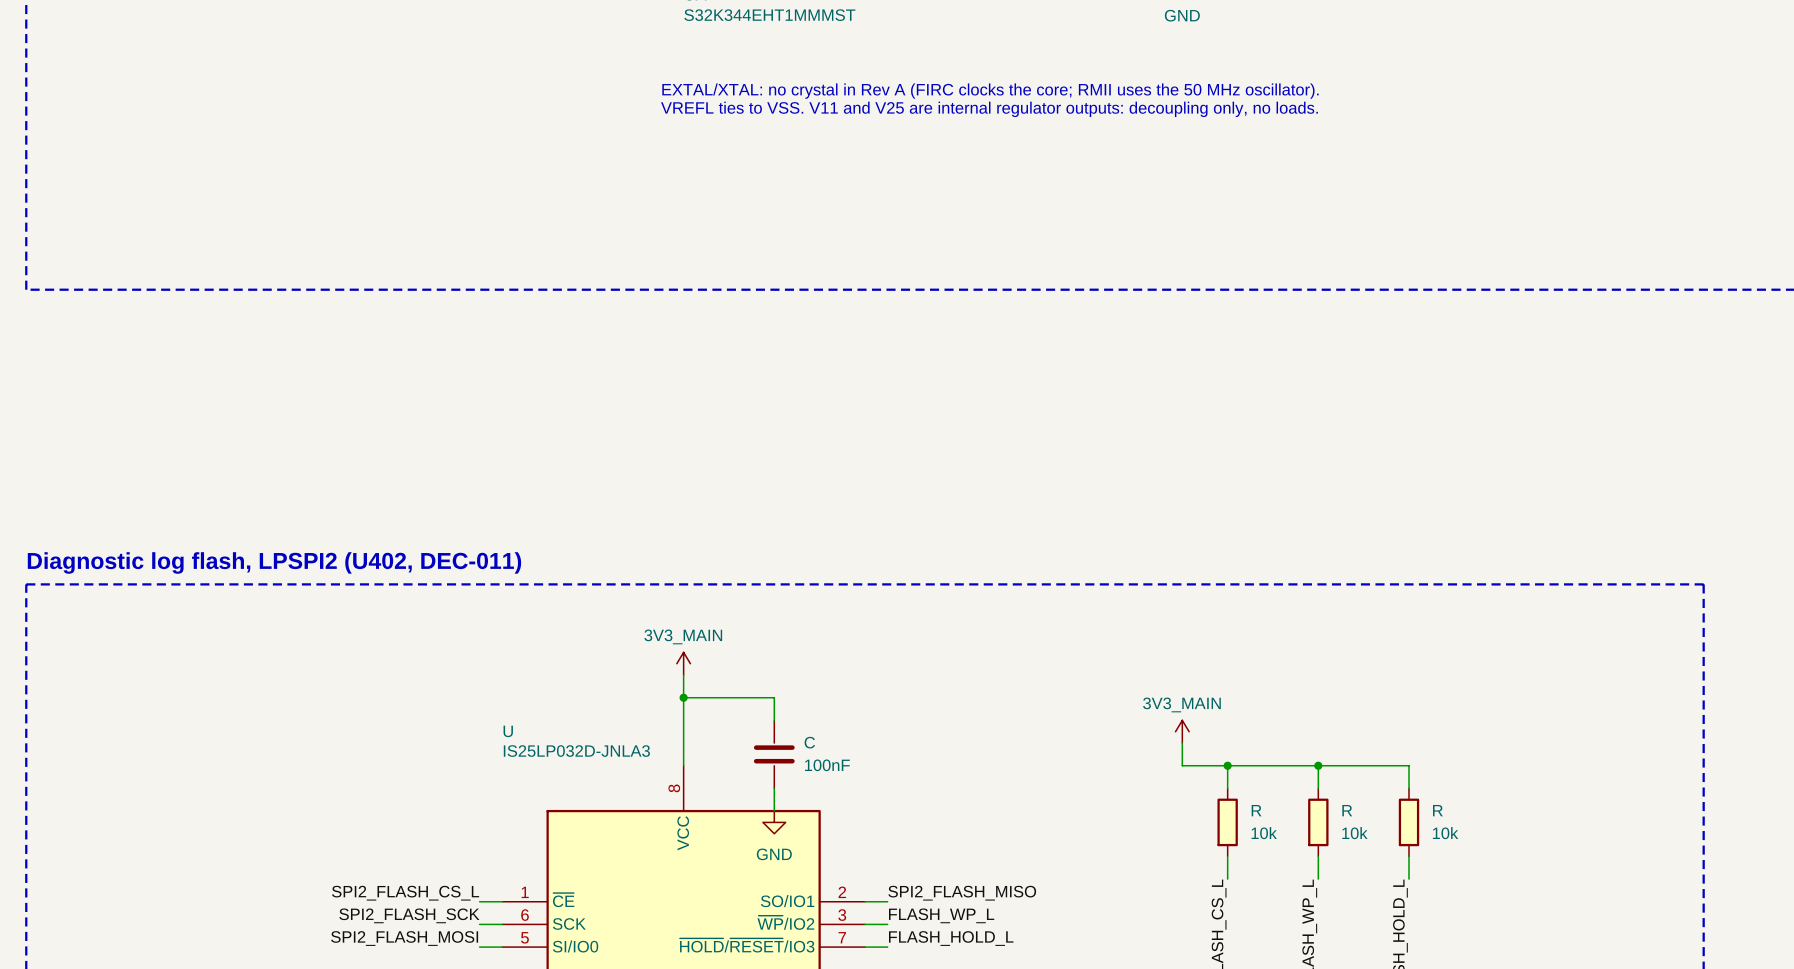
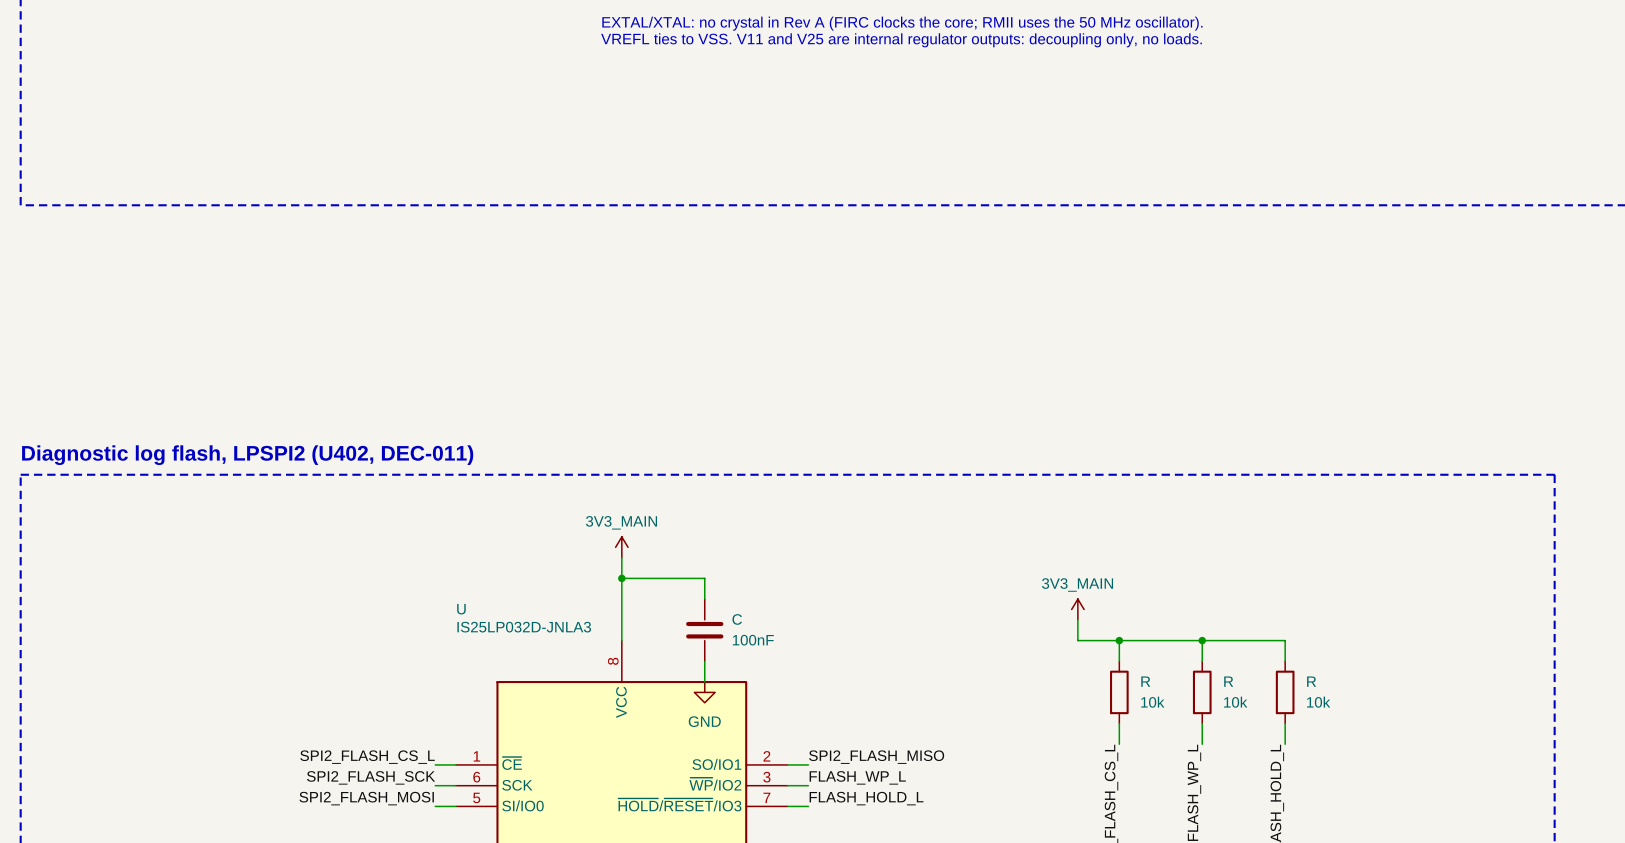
R symbol: [1217, 788, 1238, 857] -> [1110, 661, 1129, 724]
R symbol: [1308, 788, 1329, 857] -> [1192, 661, 1212, 724]
R symbol: [1398, 788, 1420, 857] -> [1275, 661, 1295, 724]

